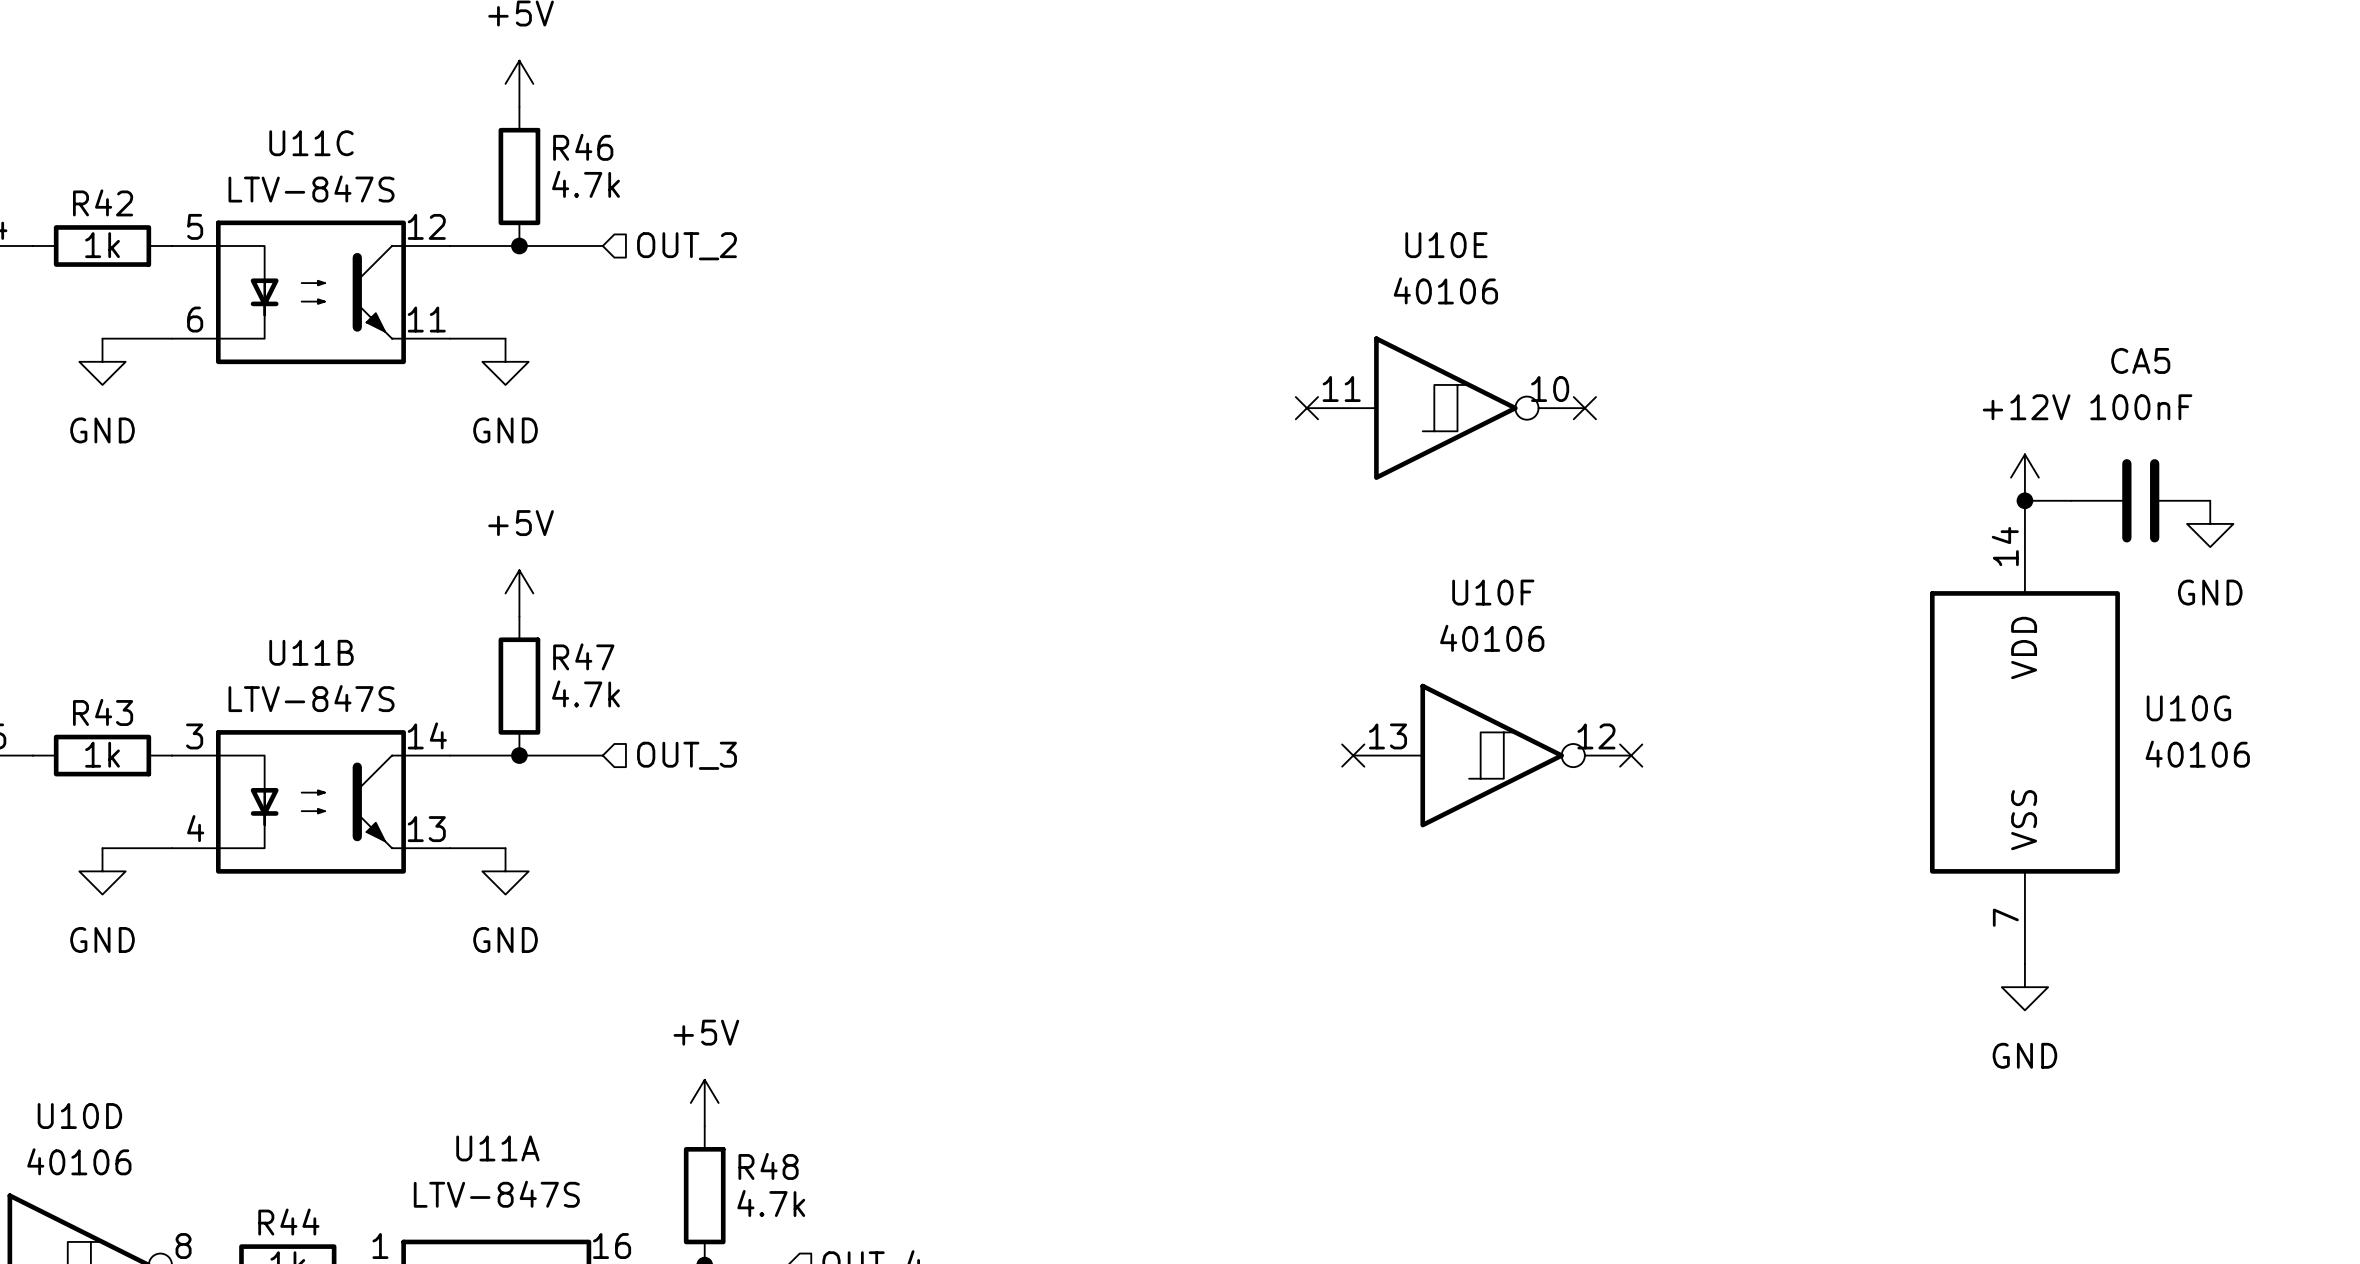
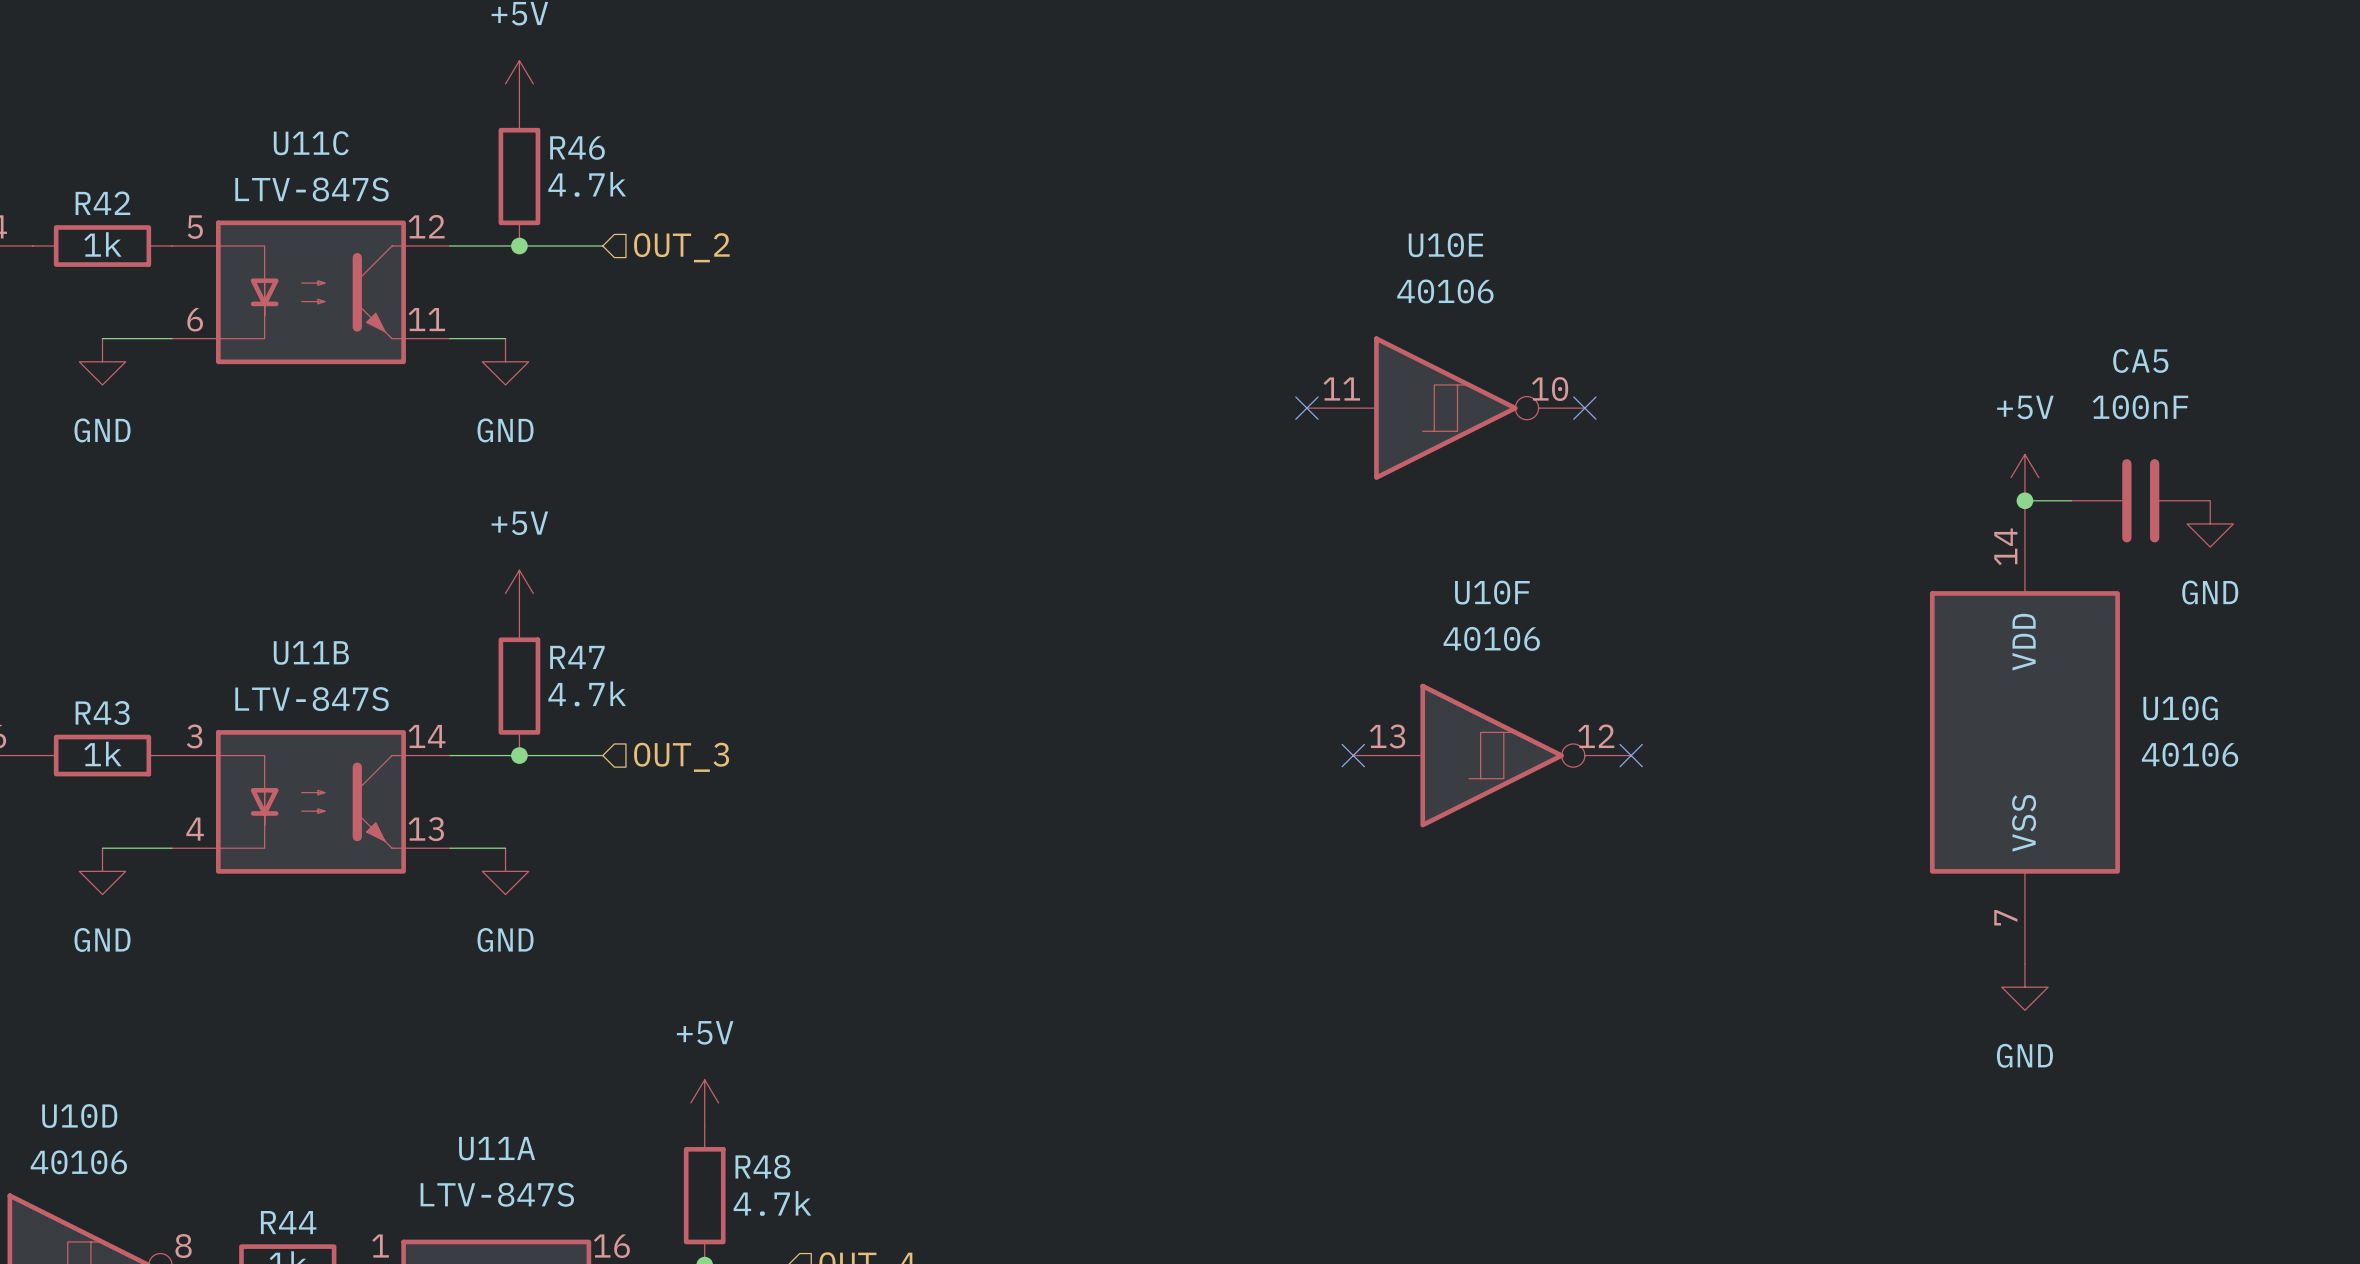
power symbol: +12V (2024, 477) -> +5V (2024, 477)

